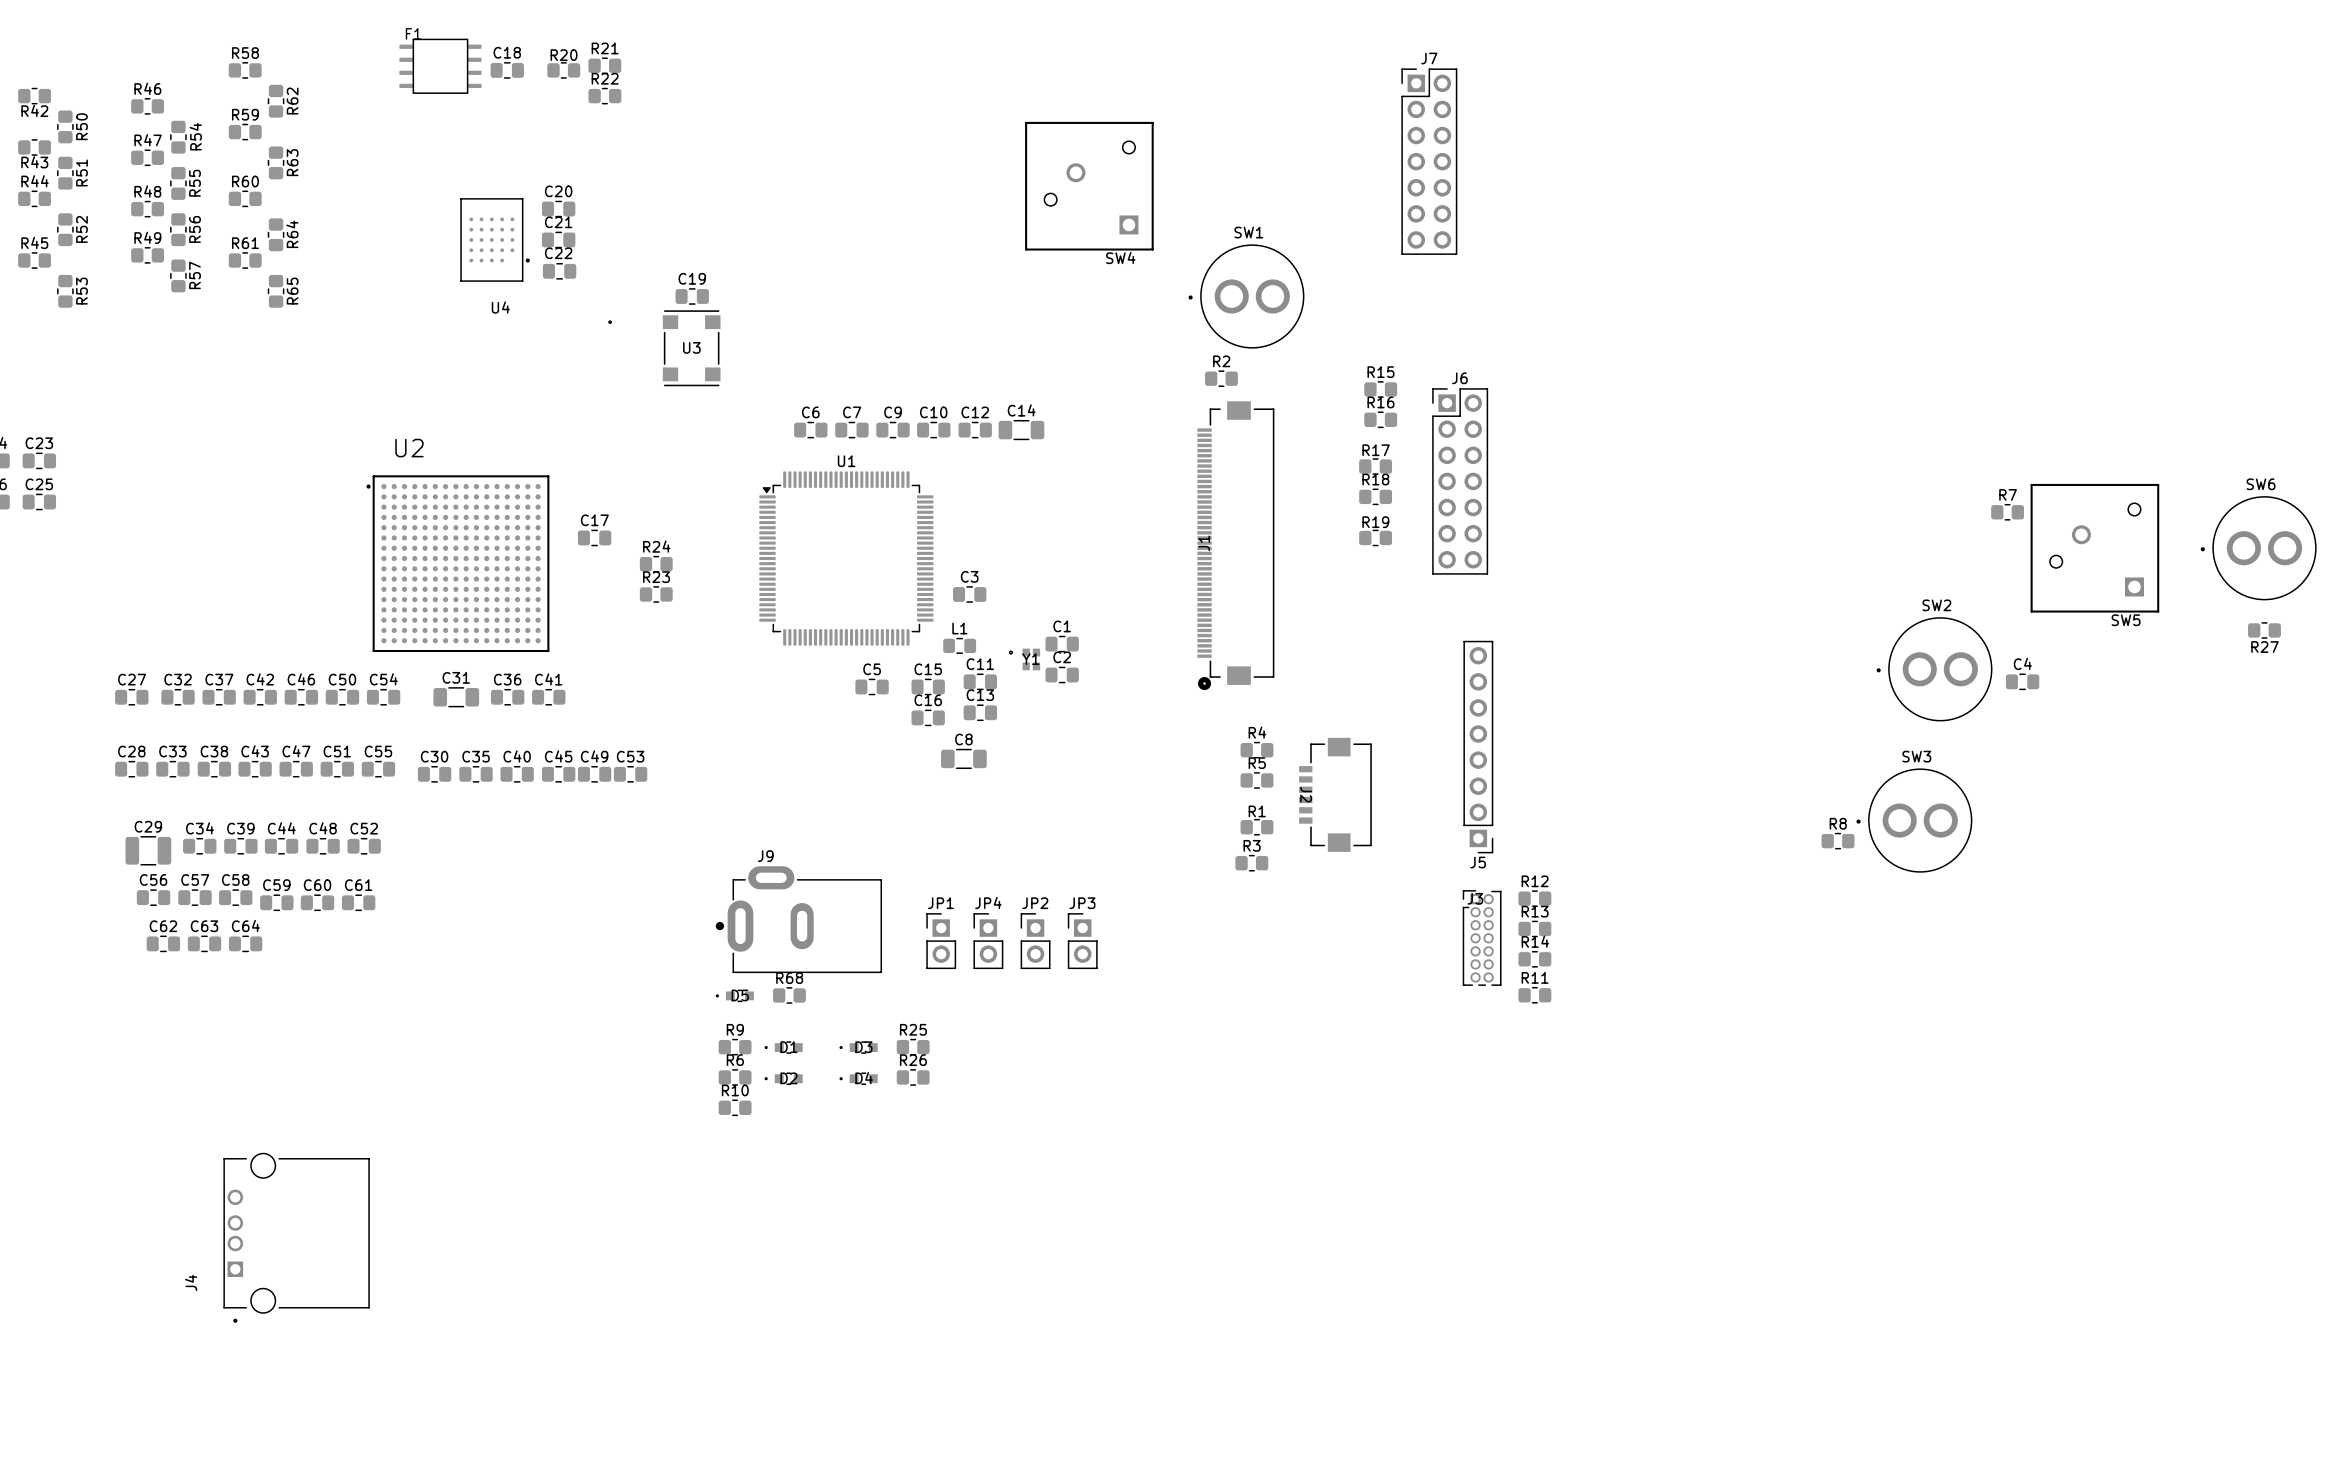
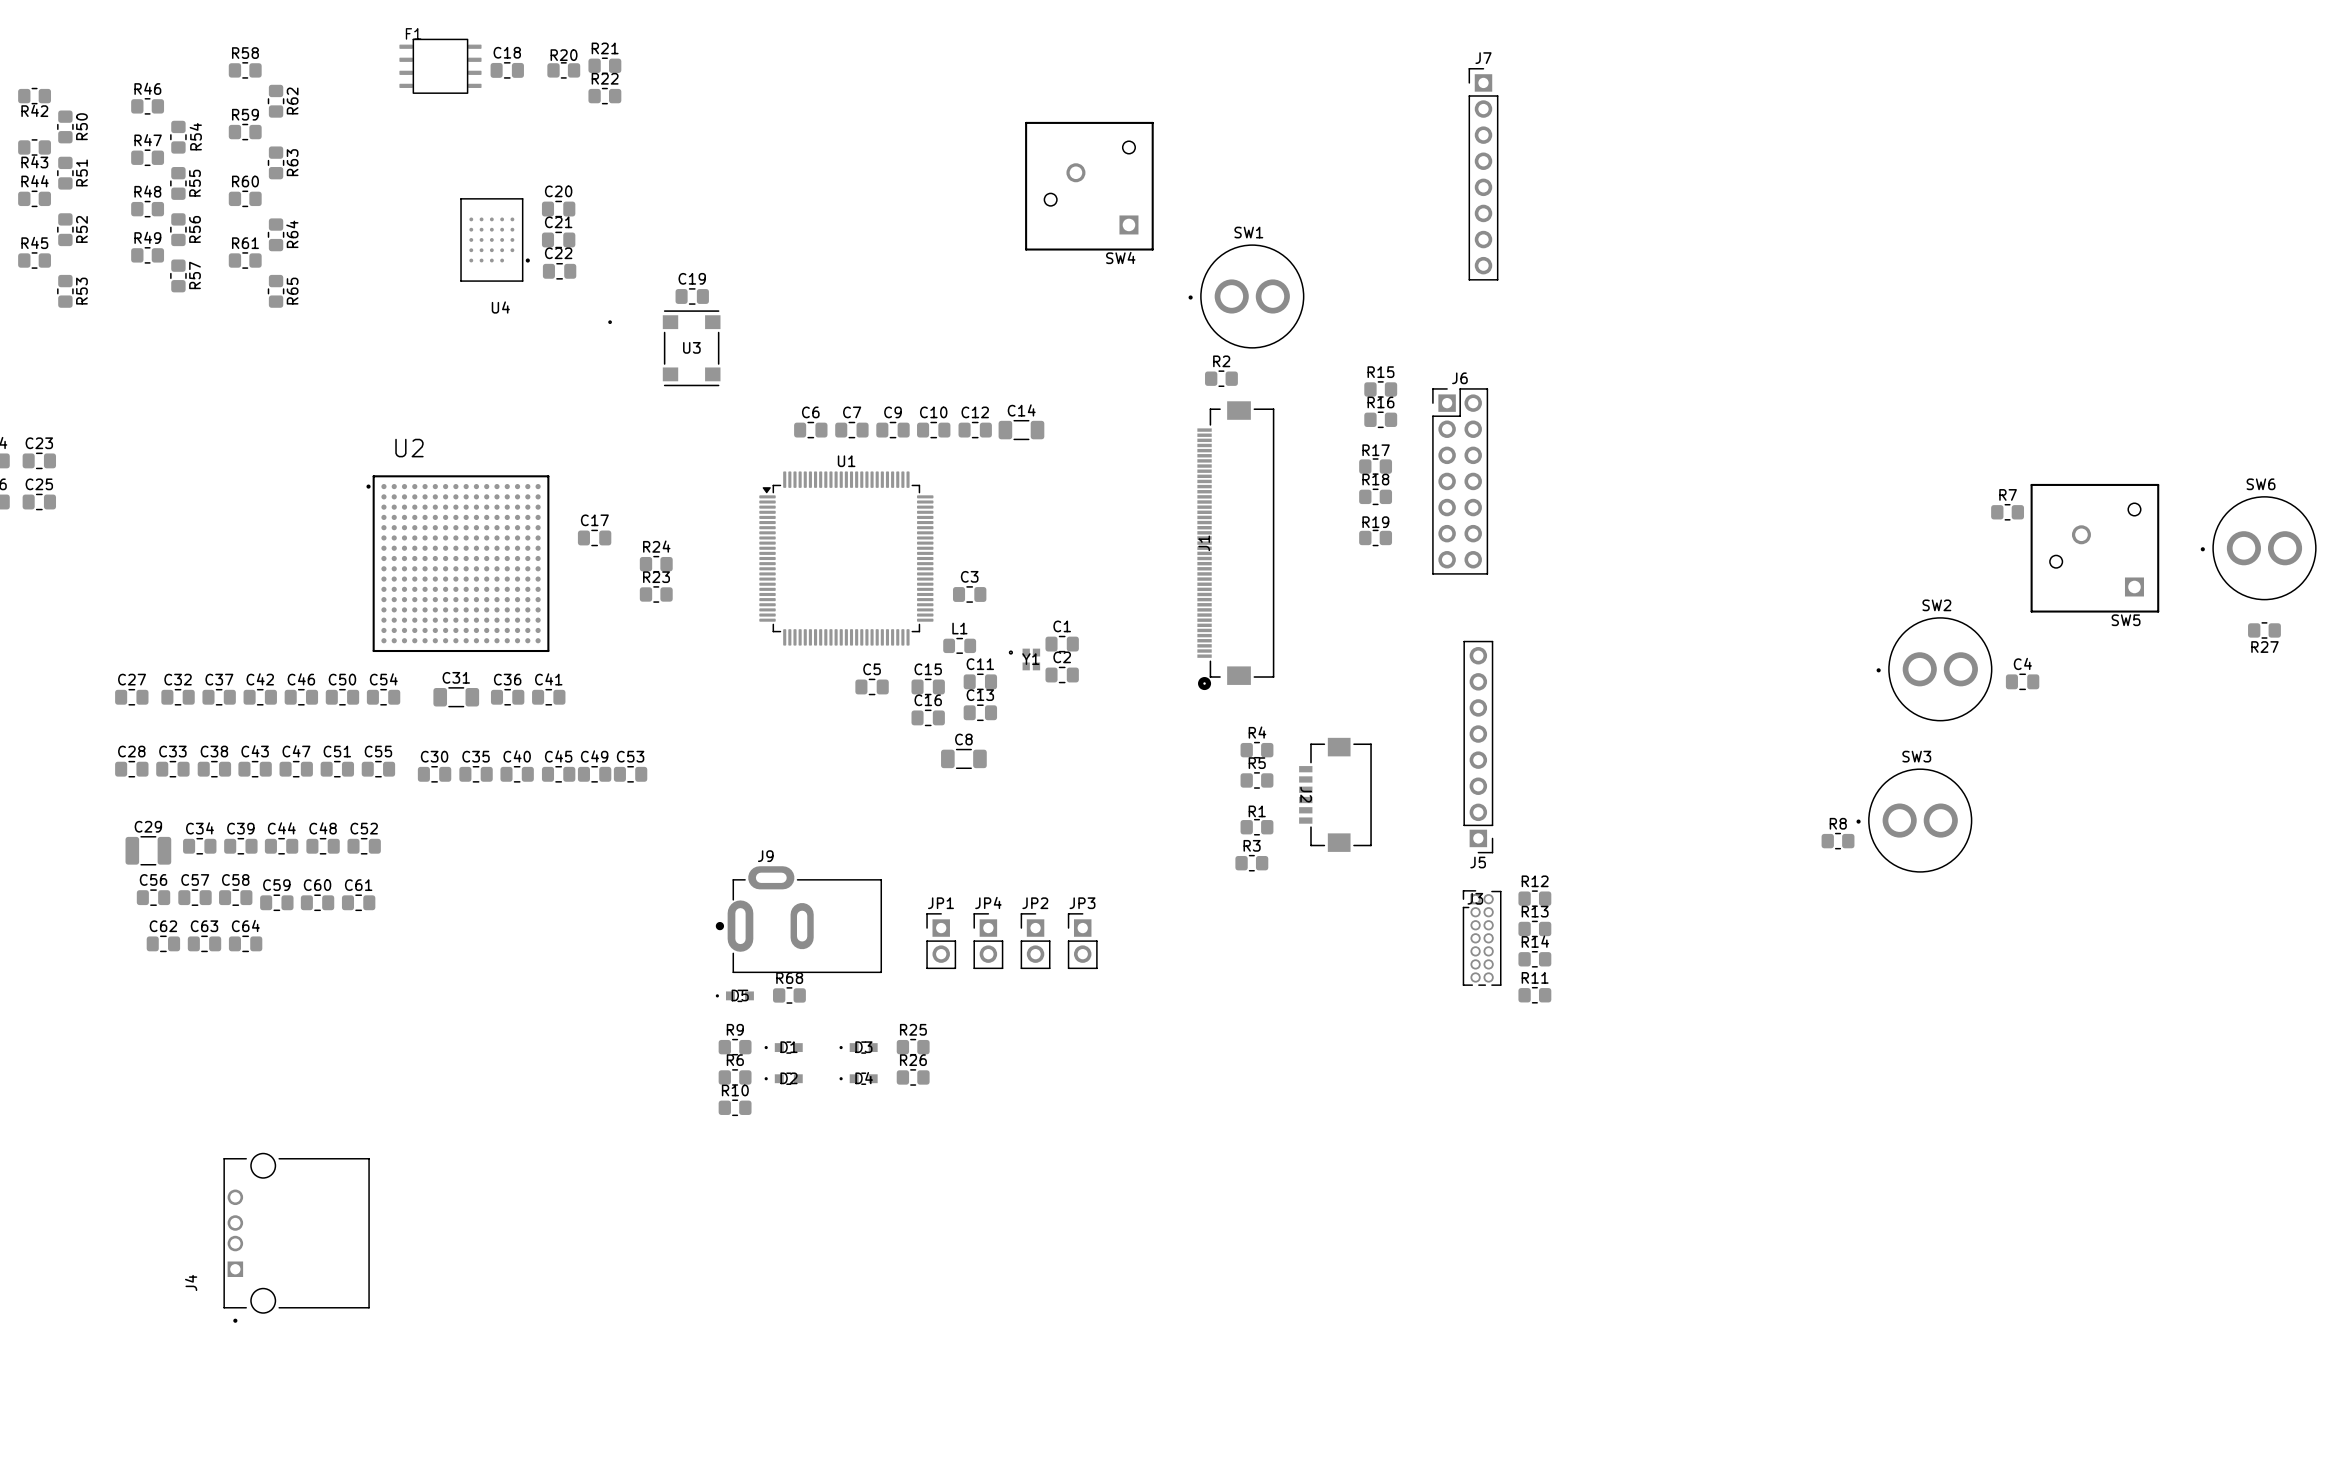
J7 footprint: [1401, 68, 1458, 255] -> [1468, 68, 1499, 281]

